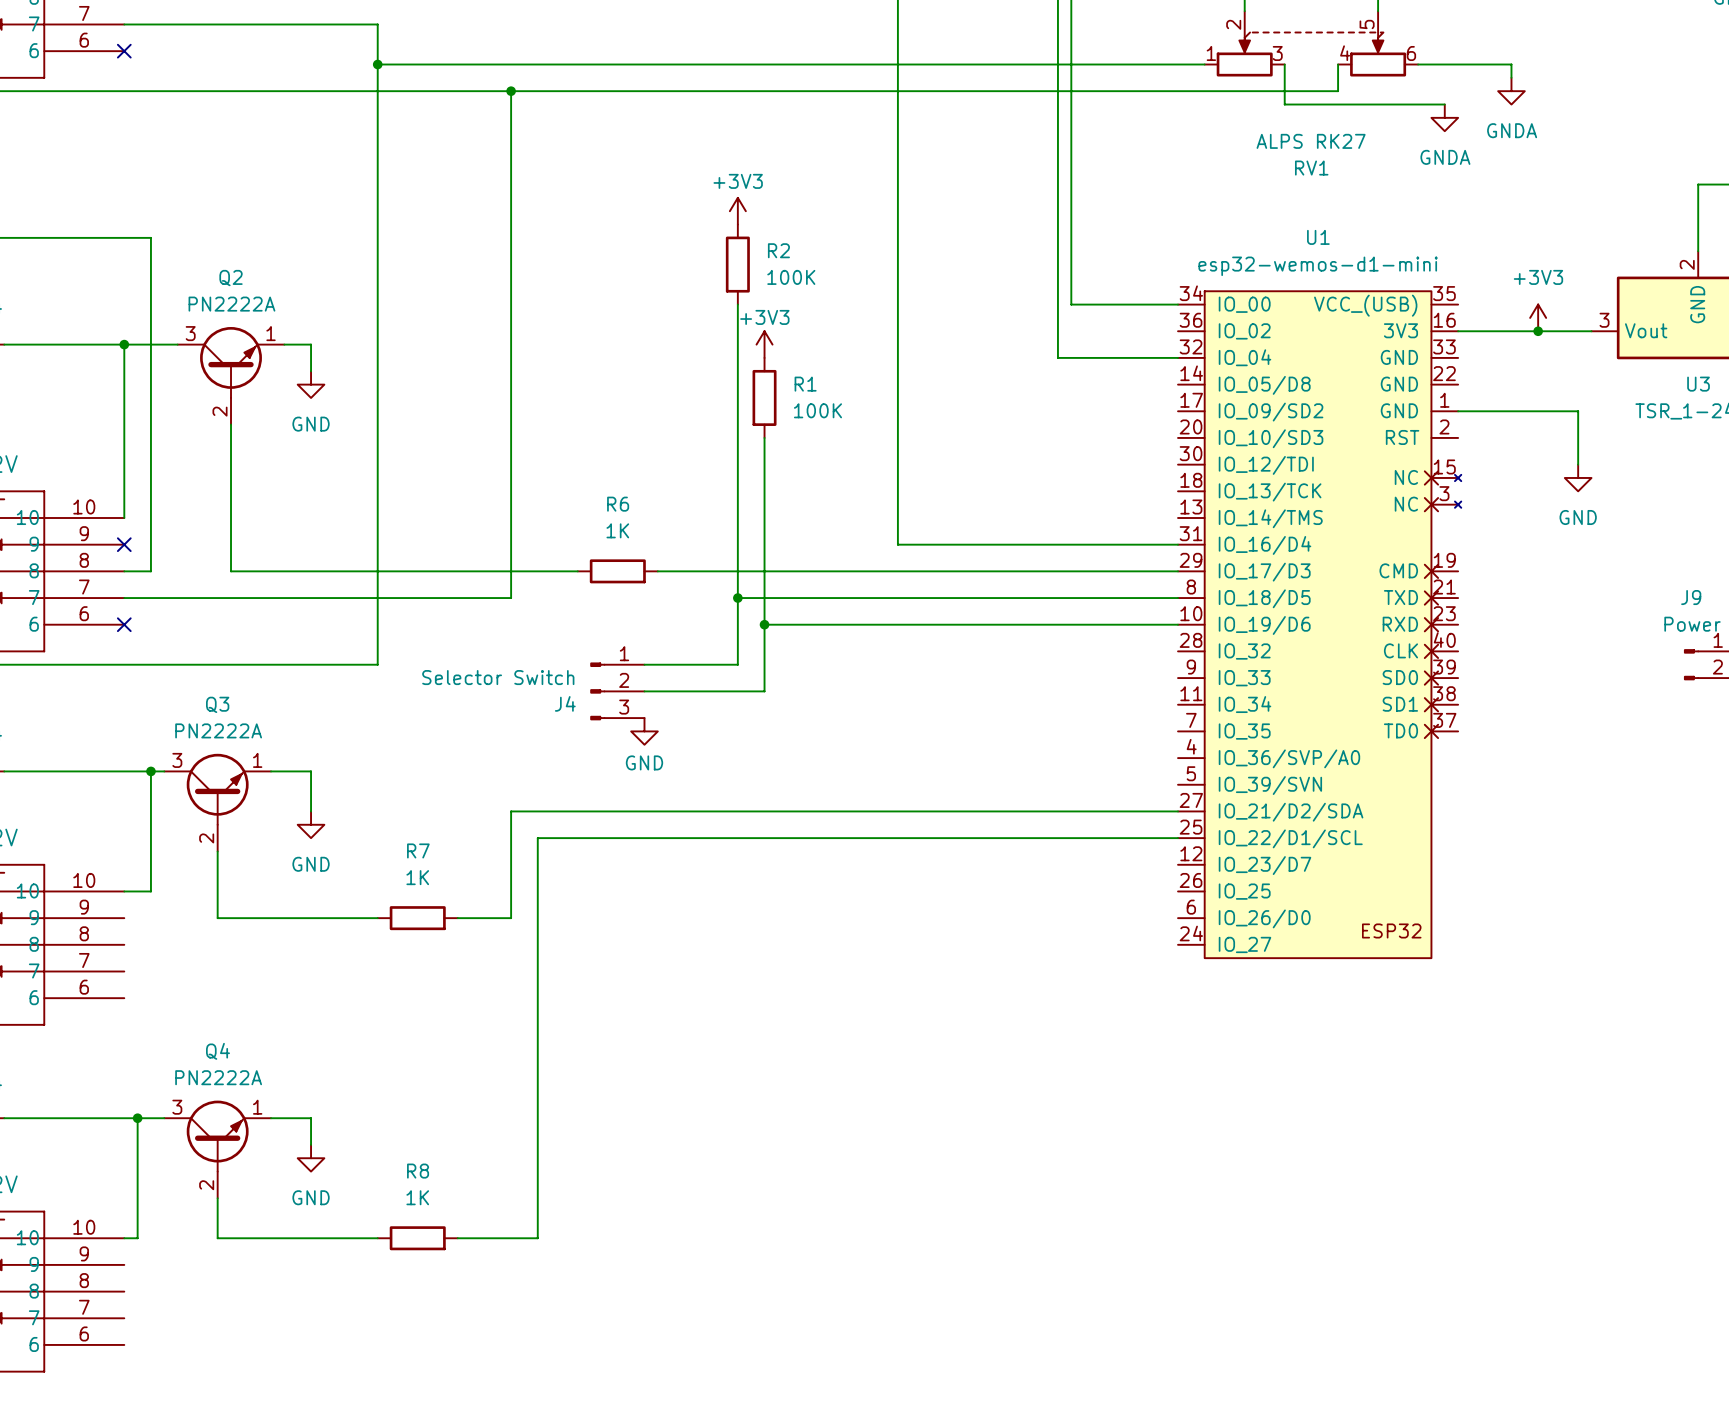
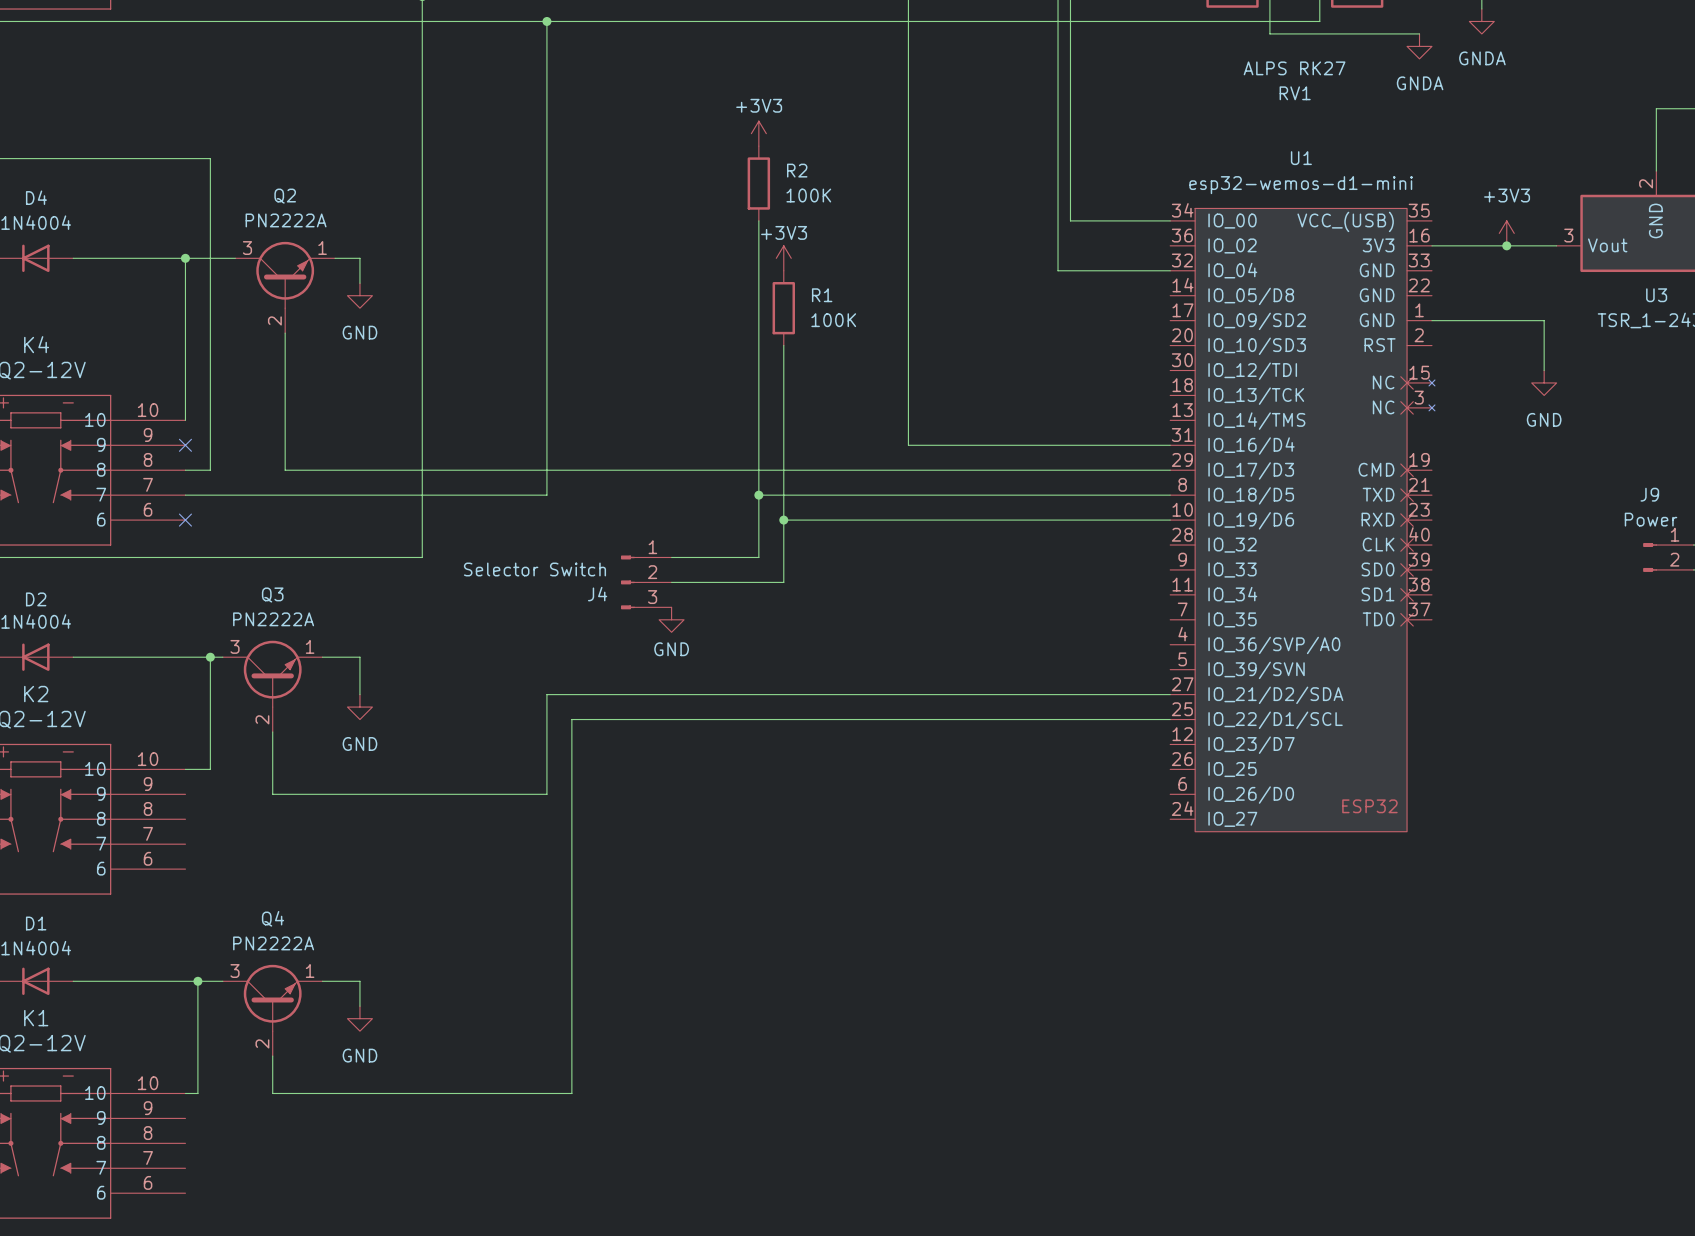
wire: none -> (609, 470) (684, 470)
R6: 1K (617, 571) -> none
wire: none -> (422, 794) (497, 794)
R7: 1K (417, 918) -> none
wire: none -> (422, 1093) (497, 1093)
R8: 1K (417, 1238) -> none

